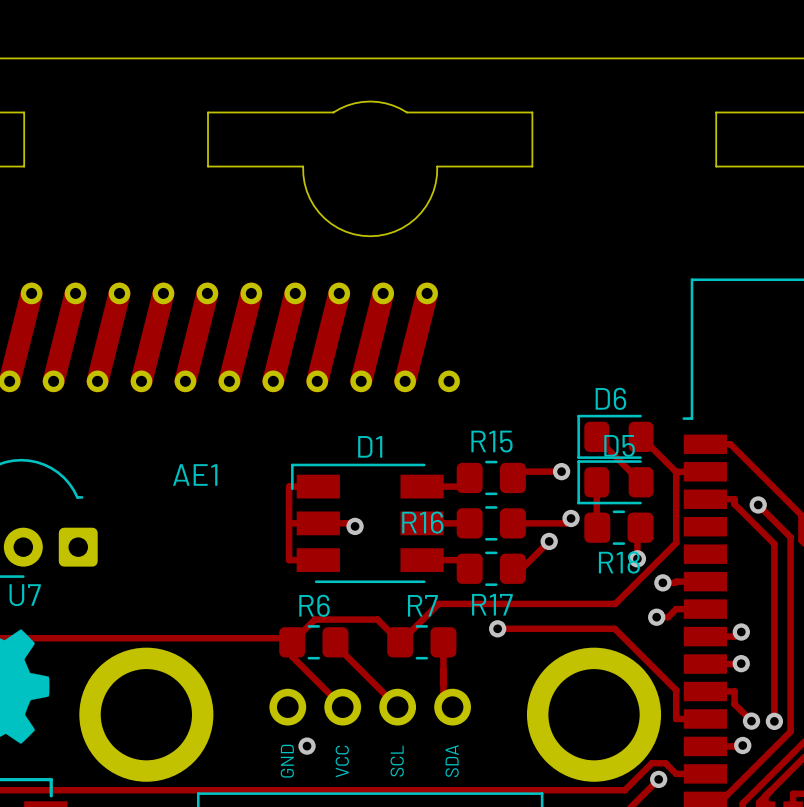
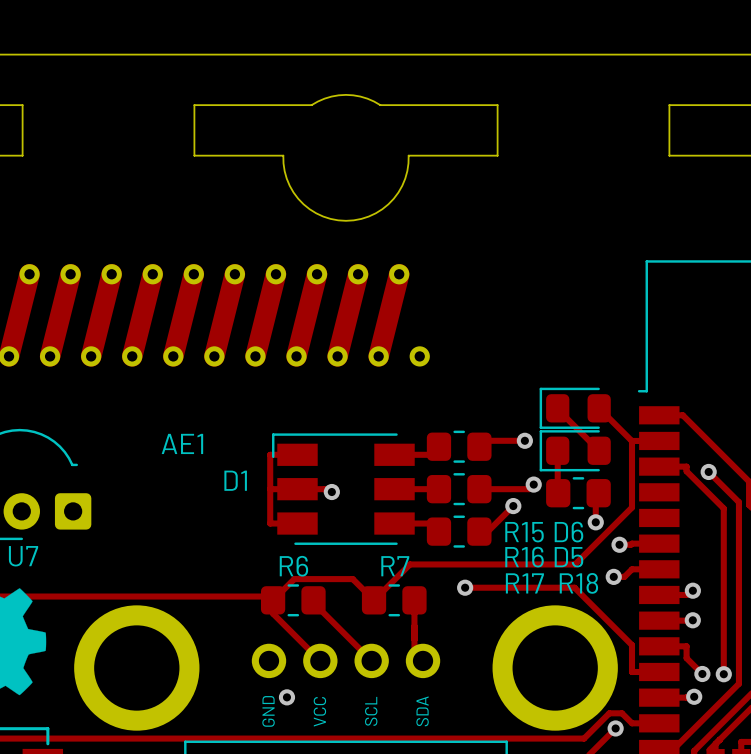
D6 name position: D6 (610, 398) -> D6 (568, 532)
R15 name position: R15 (491, 441) -> R15 (524, 532)
D5 name position: D5 (619, 445) -> D5 (568, 557)
D1 name position: D1 (370, 446) -> D1 (235, 480)
R16 name position: R16 (422, 522) -> R16 (524, 557)
R18 name position: R18 (619, 562) -> R18 (578, 583)
R17 name position: R17 (492, 604) -> R17 (524, 583)

